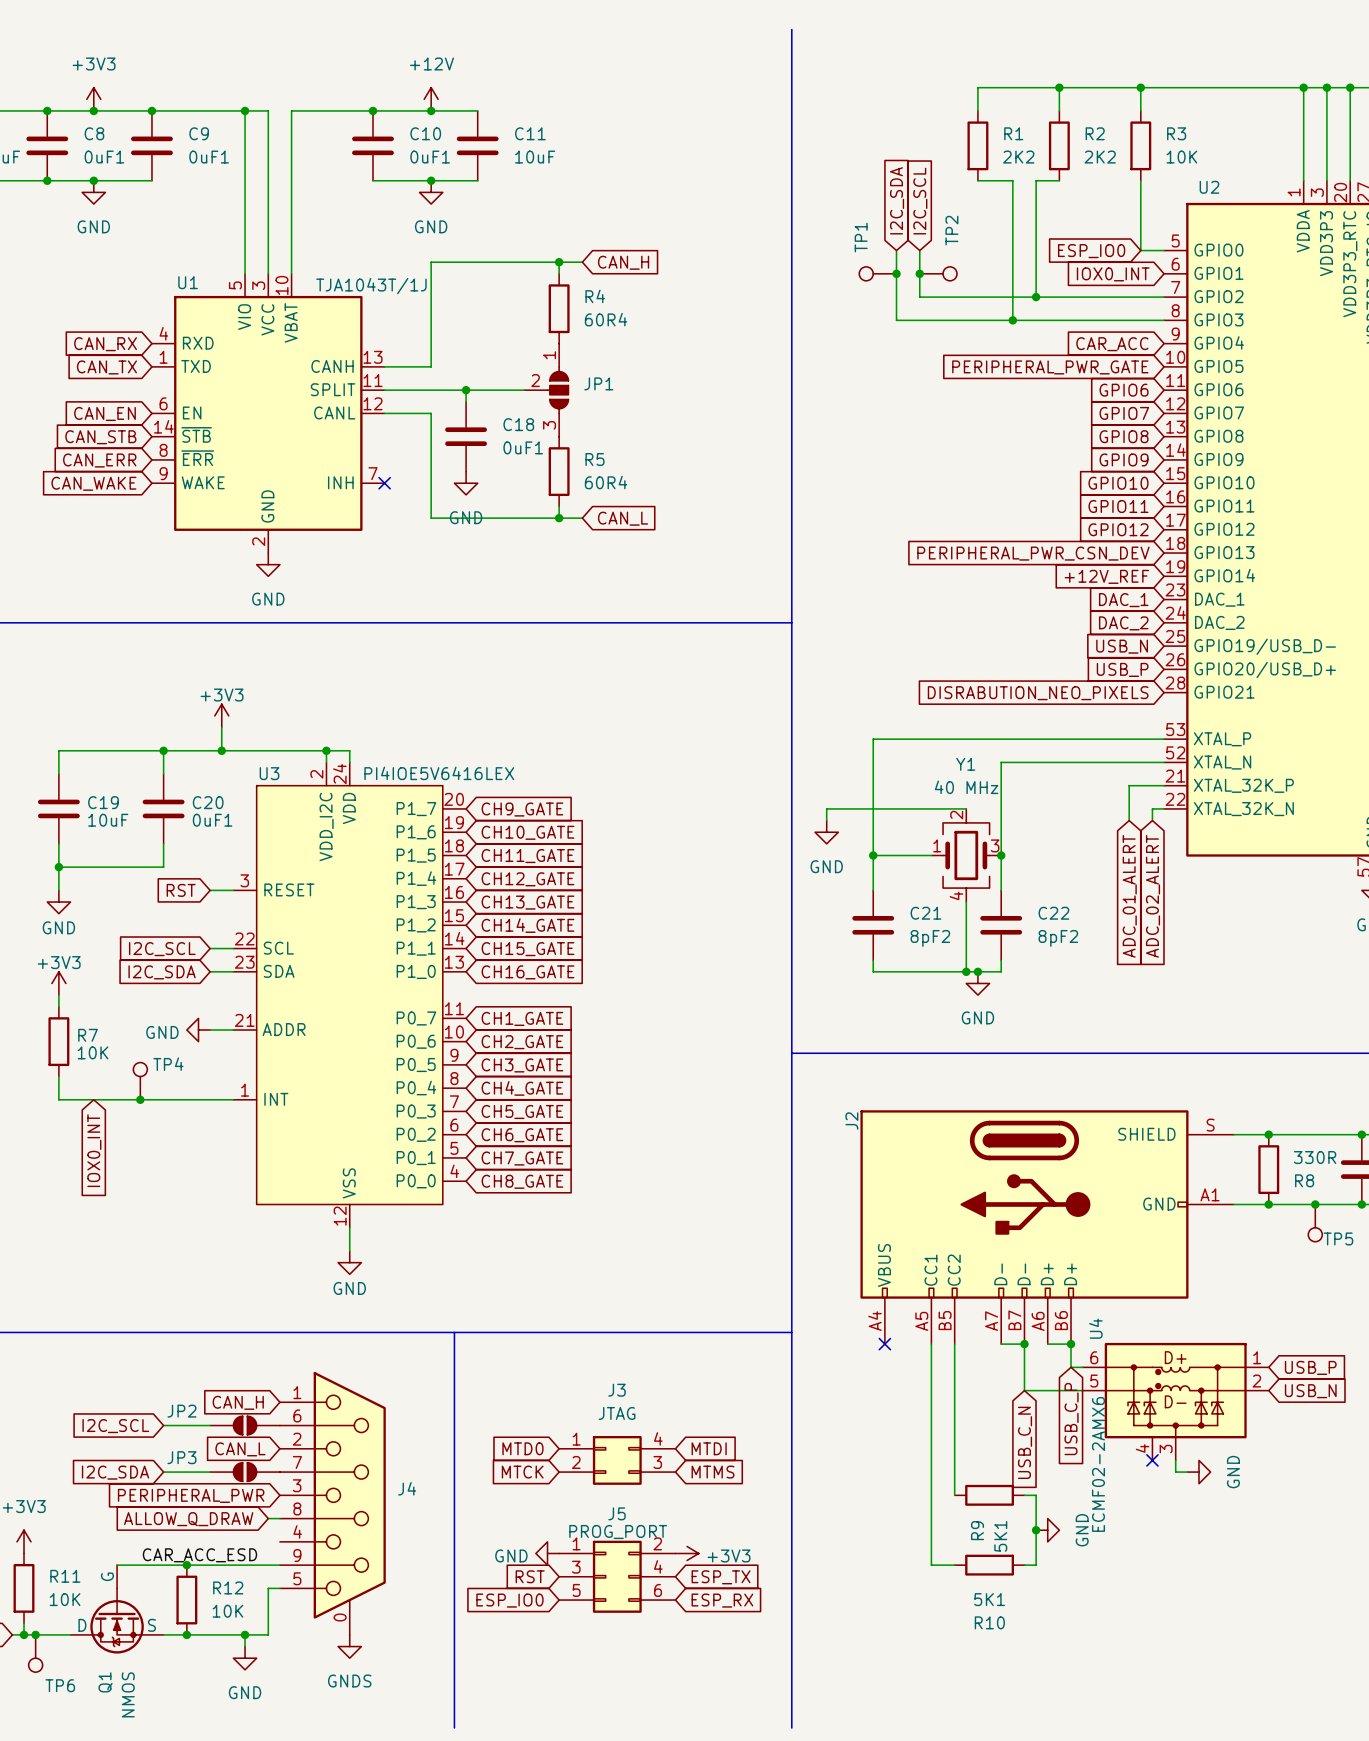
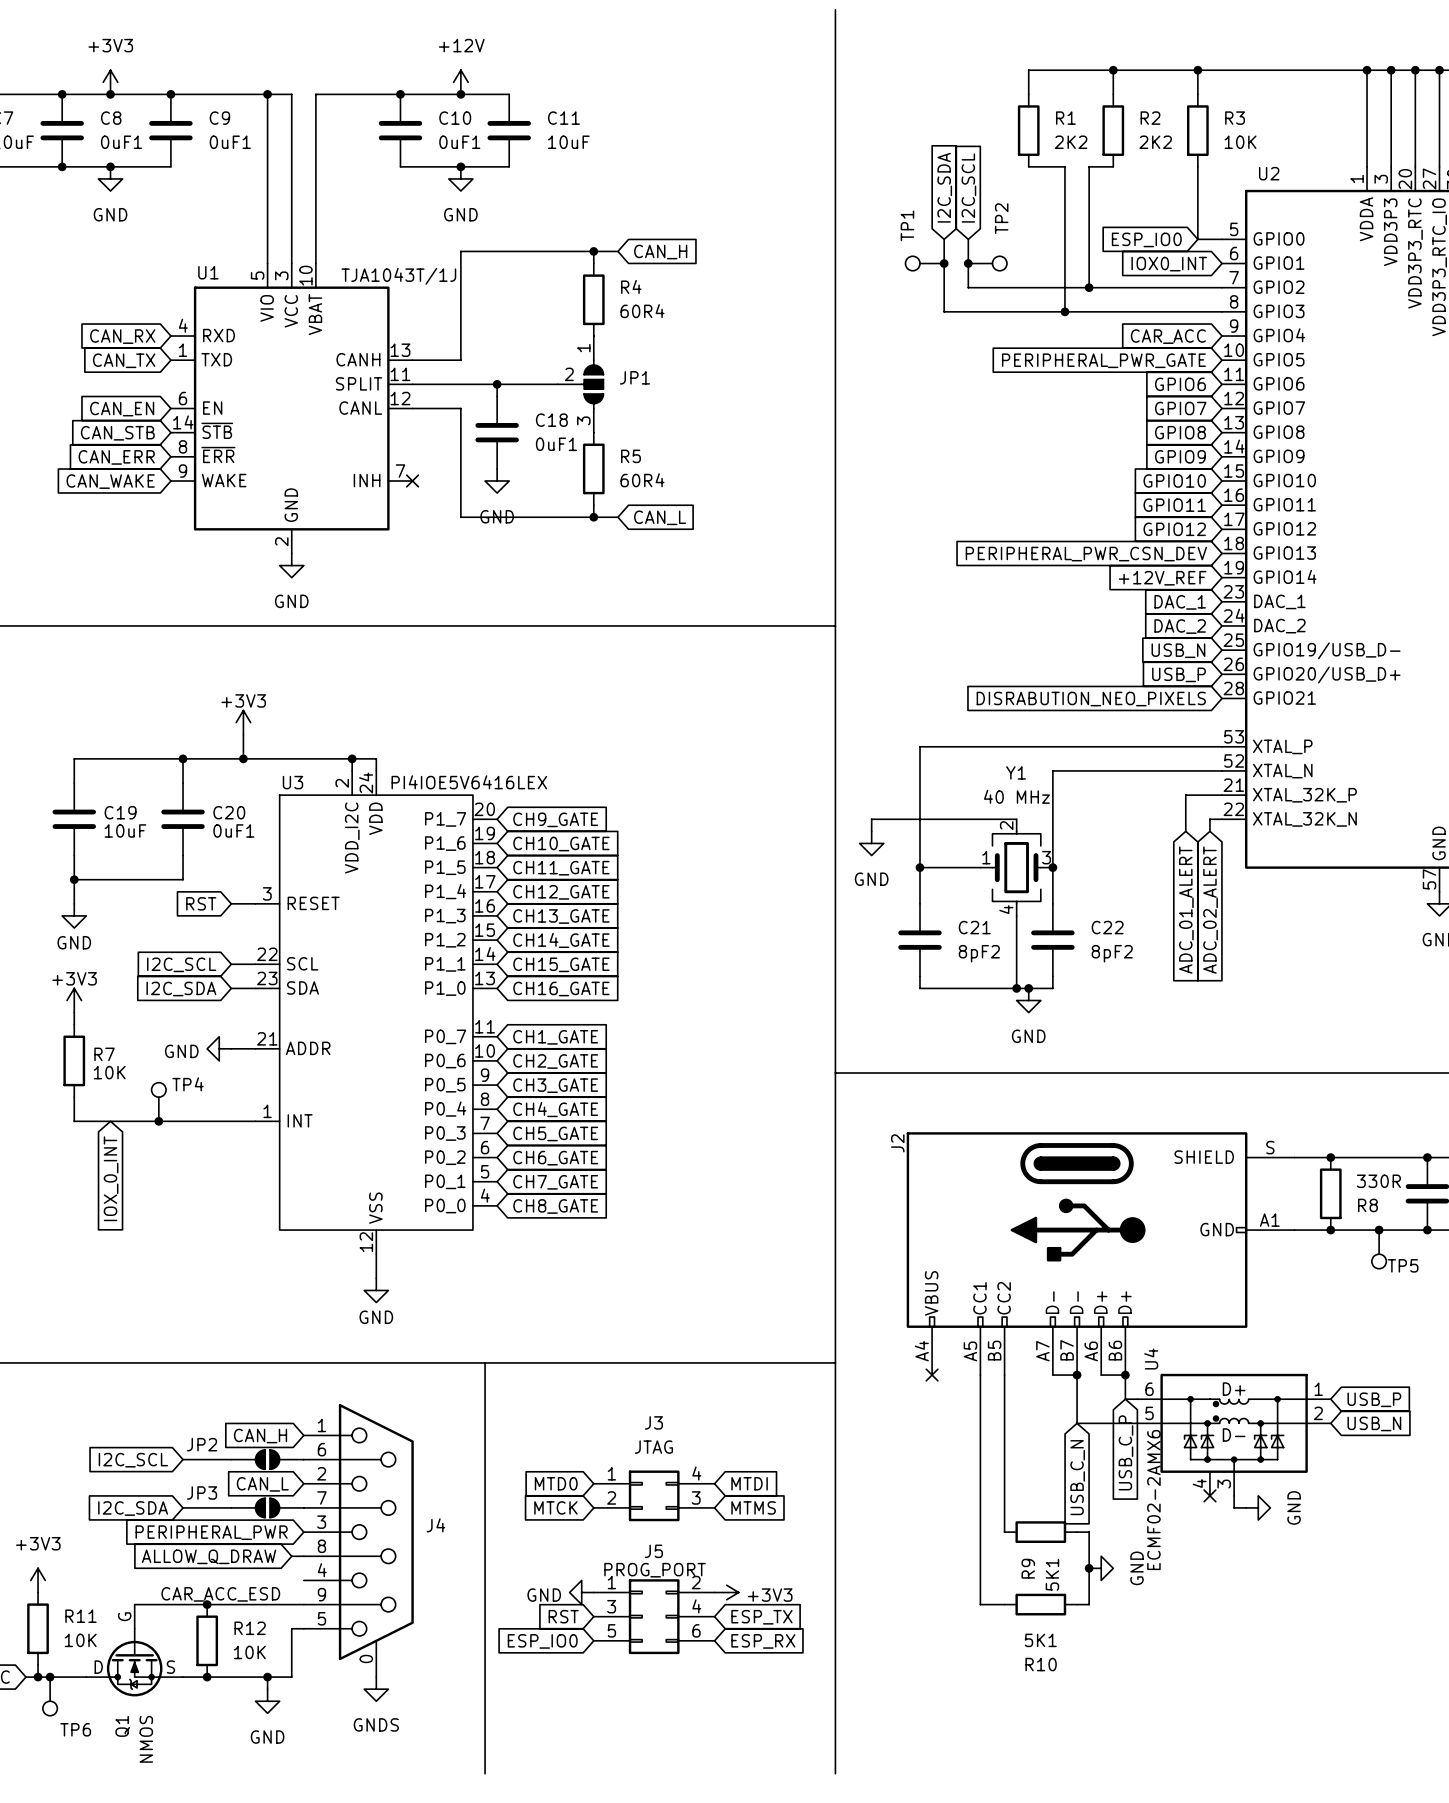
global label: IOX0_INT (94, 1150) -> IOX_0_INT (111, 1178)

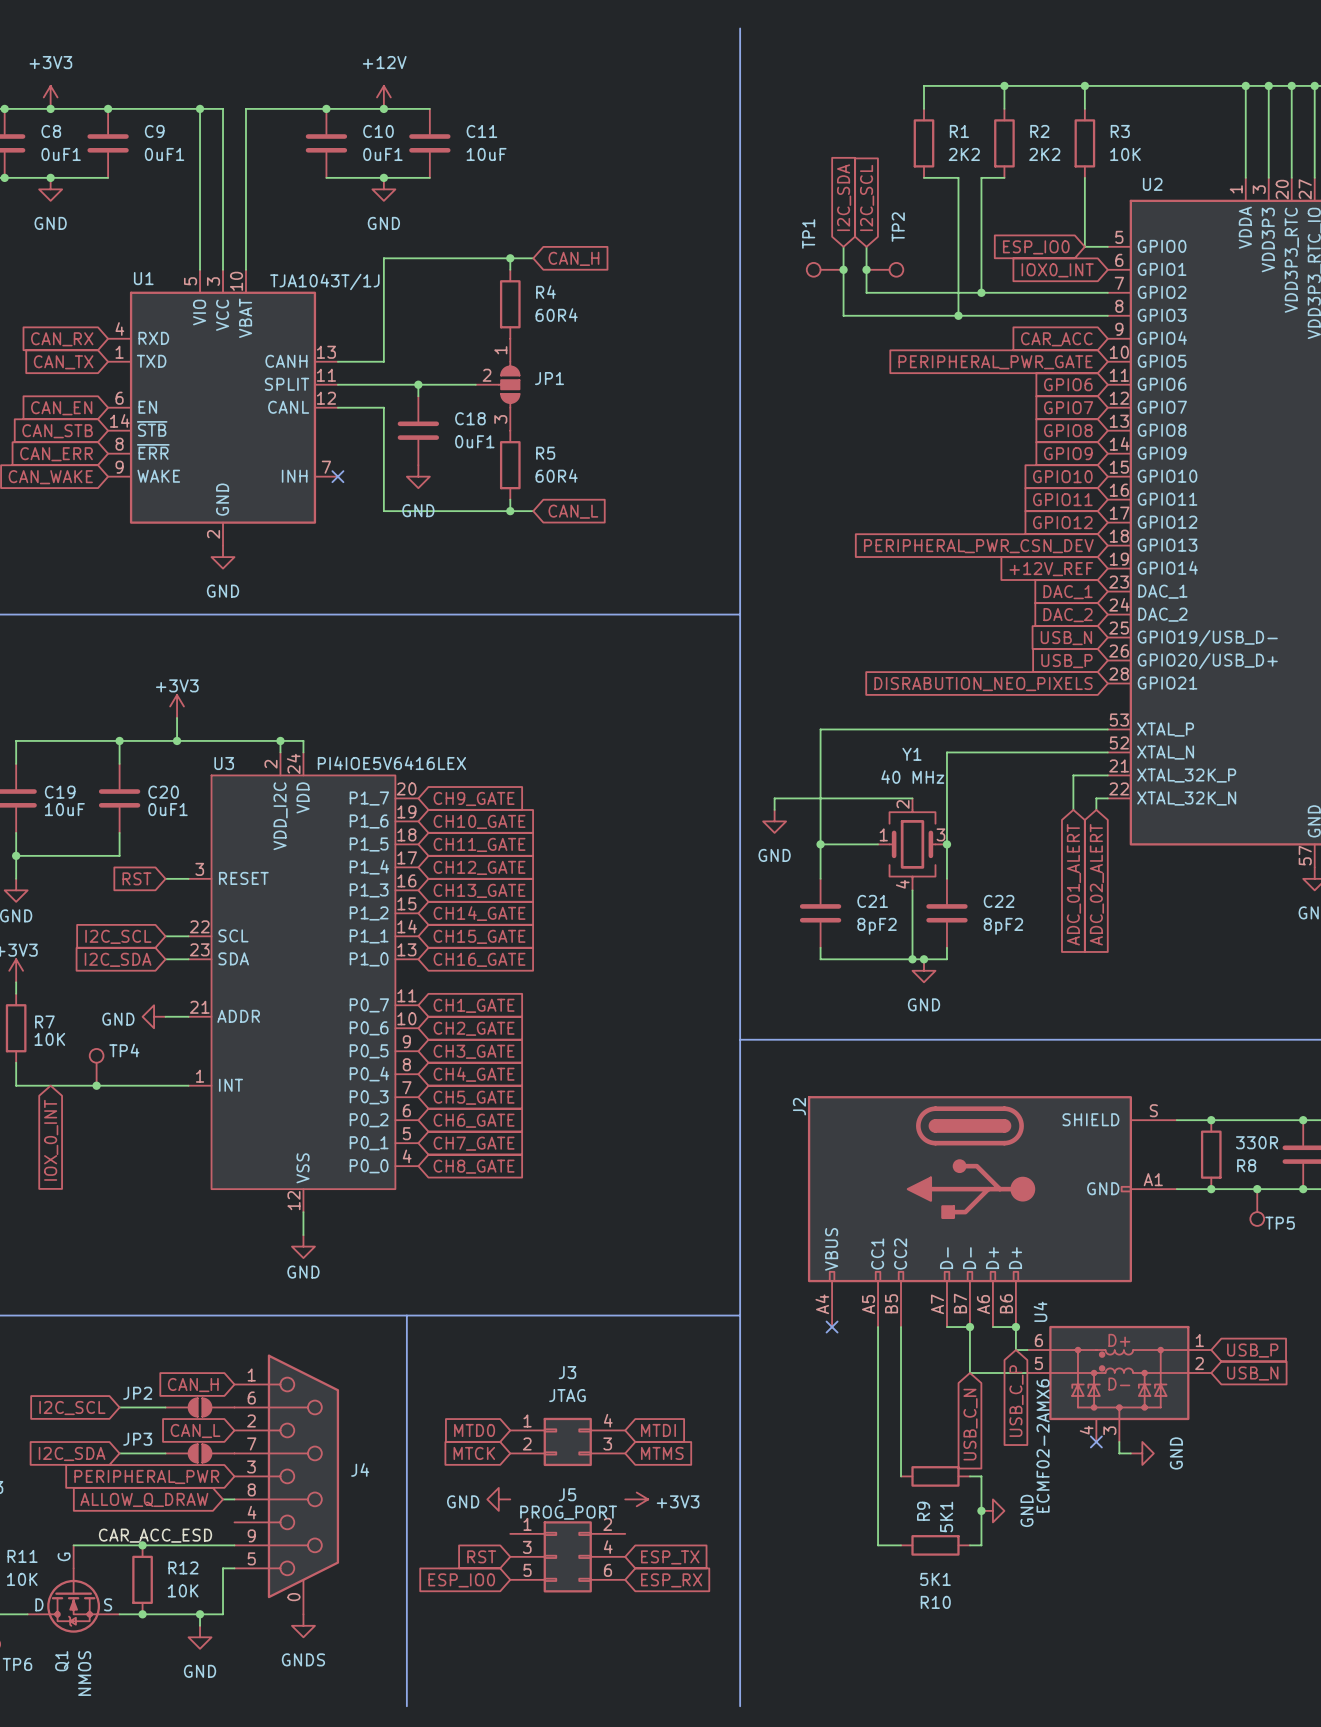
power symbol position: GND (581, 1592) -> GND (498, 1499)
power symbol position: +3V3 (726, 1592) -> +3V3 (636, 1499)

